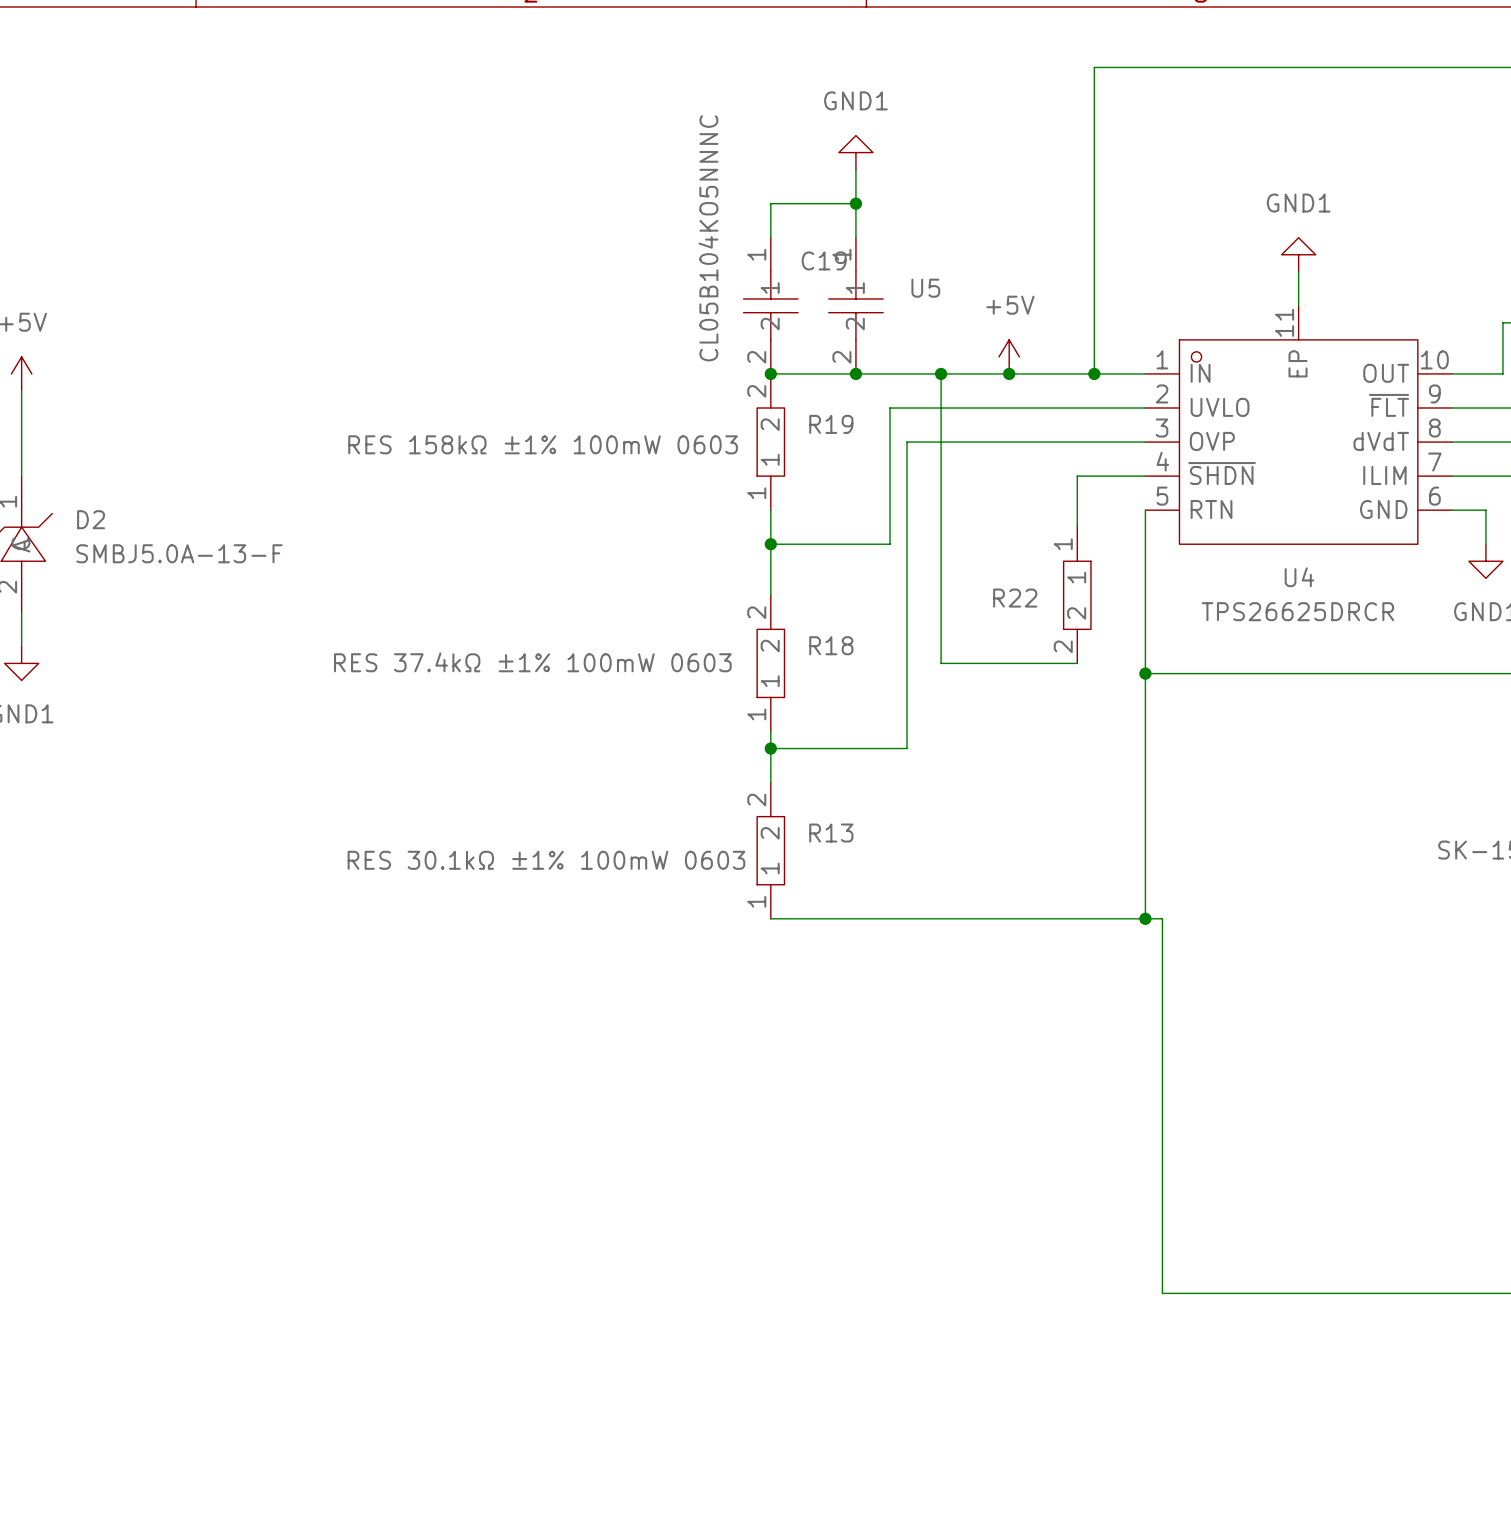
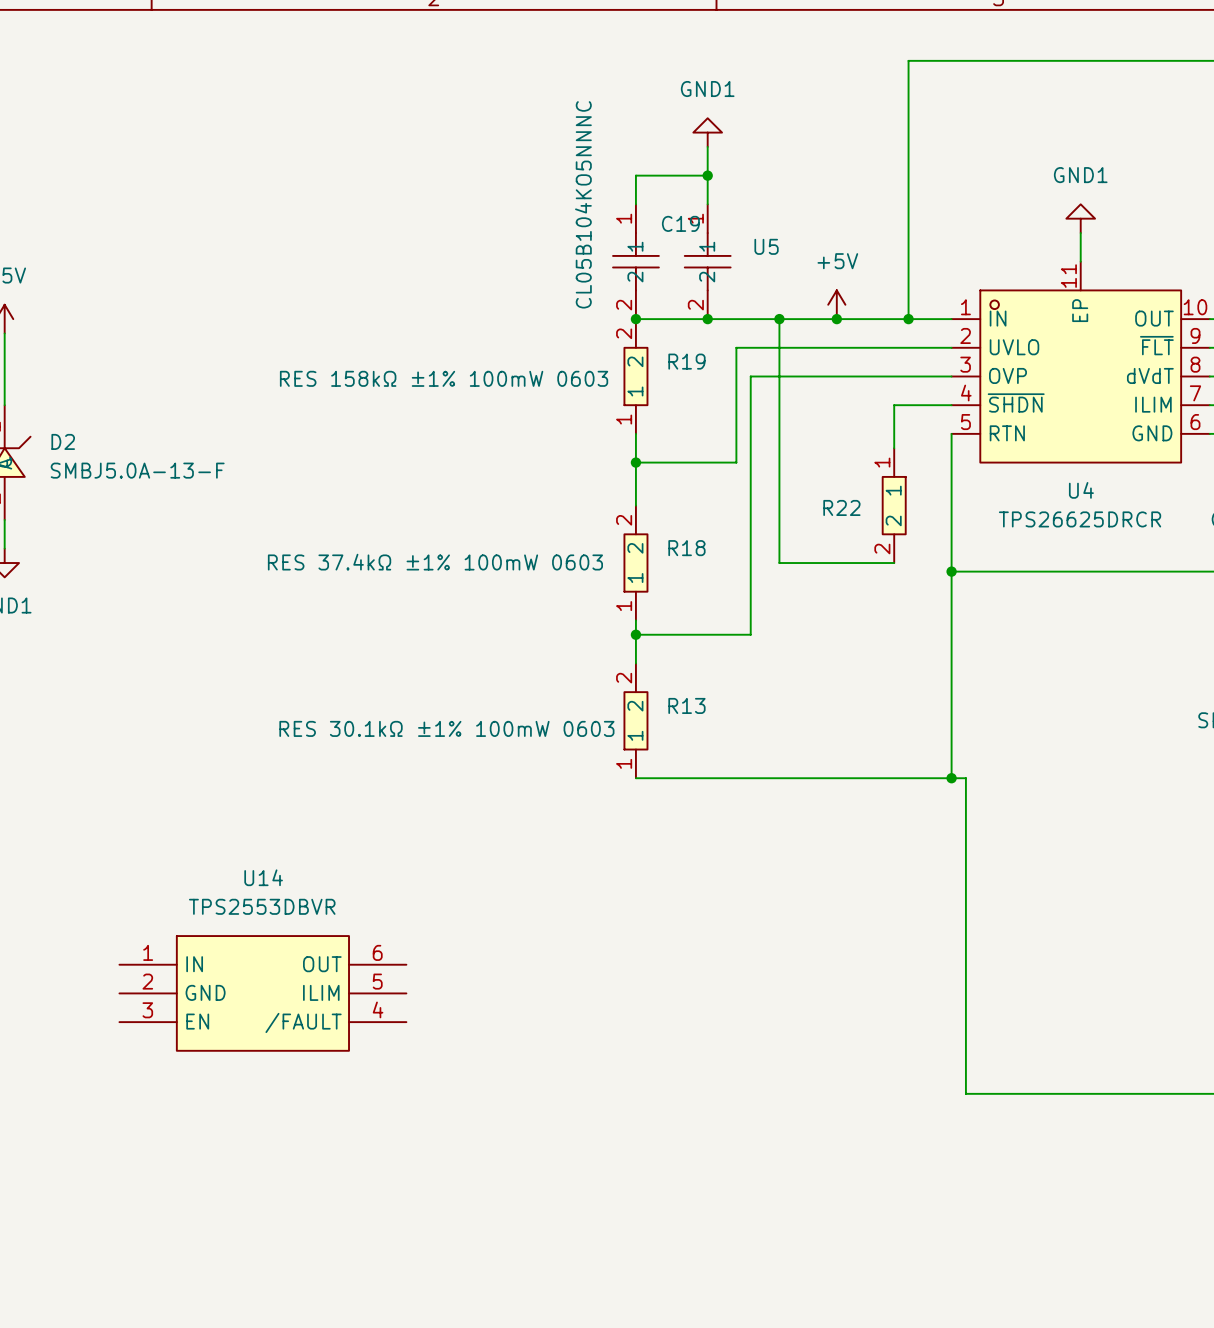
U14: none -> TPS2553DBVR (262, 993)

